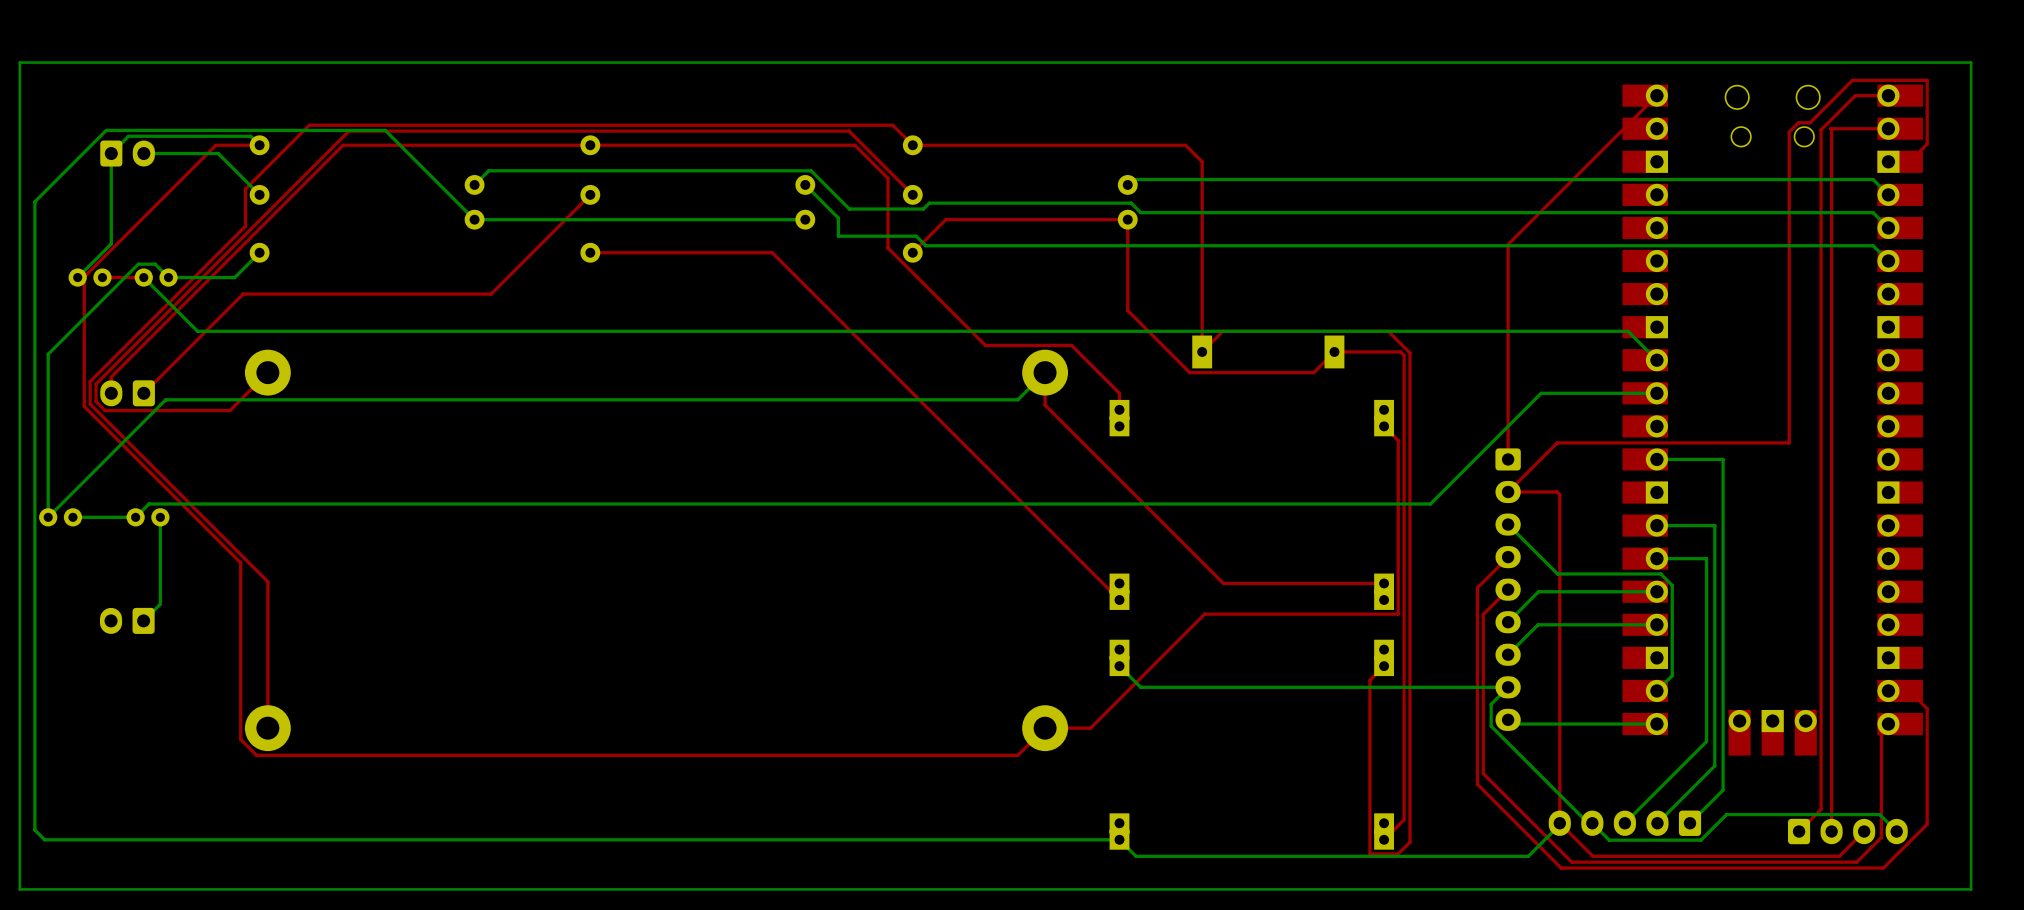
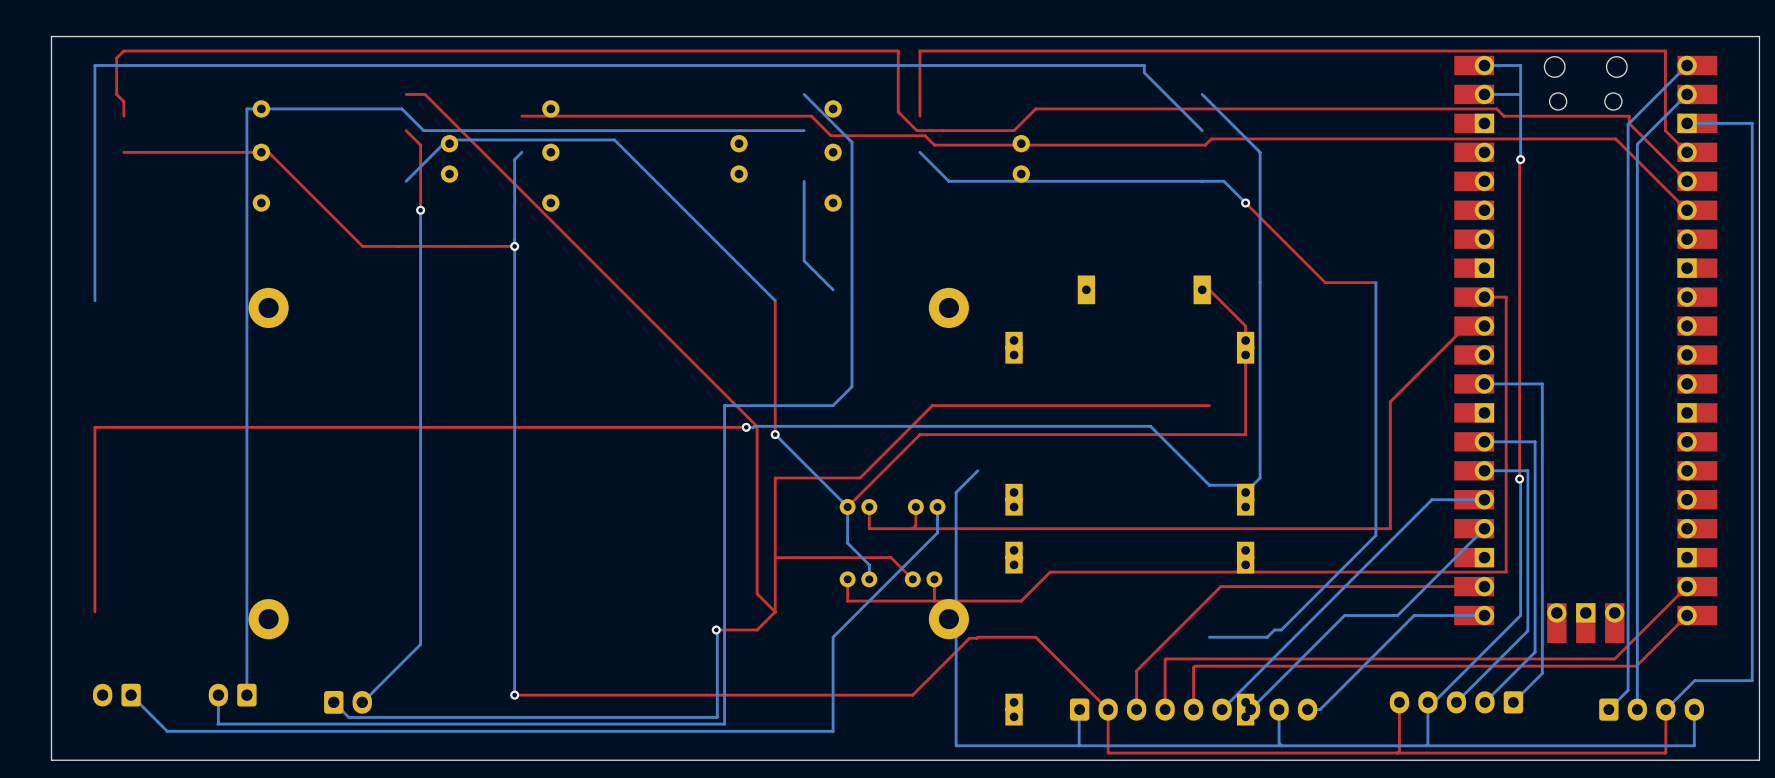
bottom track: (1971, 62) (19, 62) (19, 889) (1971, 889) (1971, 62) -> none
board edge: none -> (1759, 36) (51, 36) (51, 760) (1759, 760) (1759, 36)
bottom track: none -> (1484, 65) (1520, 65) (1520, 159)
top track: (1656, 95) (1508, 244) (1508, 459) -> none
bottom track: none -> (1687, 65) (1628, 124) (1628, 690) (1608, 709)
top track: (1888, 95) (1855, 95) (1821, 129) (1821, 809) (1799, 831) -> none
top track: none -> (406, 94) (425, 94) (757, 426) (757, 593) (775, 611)
bottom track: none -> (804, 94) (852, 142) (852, 386) (833, 405) (724, 405) (724, 724) (217, 724) (218, 695)
bottom track: none -> (1202, 94) (1260, 152) (1260, 478) (1252, 485) (1209, 485) (1150, 426) (746, 427)
bottom track: none -> (1520, 94) (1484, 94)
bottom track: none -> (1687, 94) (1637, 144) (1637, 709)
top track: (1888, 128) (1830, 128) (1831, 831) -> none
bottom track: (259, 145) (250, 136) (128, 136) (111, 153) (111, 243) (77, 277) -> none
top track: (259, 145) (215, 145) (84, 276) (84, 406) (240, 562) (240, 739) (256, 755) (1017, 755) (1045, 728) (1090, 728) (1204, 614) (1398, 614) (1398, 440) (1384, 426) -> none
top track: (1144, 145) (912, 145) (892, 125) (309, 125) (245, 189) (245, 226) (90, 381) (90, 404) (267, 581) (267, 728) -> (1035, 108) (1014, 130) (916, 130) (898, 111) (898, 51) (123, 51) (116, 58) (116, 94) (123, 101) (123, 116)
top track: (1185, 145) (1202, 161) (1202, 351) (1222, 331) (1388, 331) (1409, 352) (1409, 842) (1398, 853) (1369, 853) (1369, 680) (1384, 666) -> (1071, 108) (1496, 108) (1504, 116) (1629, 116) (1629, 123) (1687, 181)
part: (127, 153) -> none
bottom track: (143, 153) (218, 153) (259, 194) -> none
top track: none -> (521, 116) (811, 116) (831, 135) (925, 135) (934, 145) (1205, 145) (1211, 138) (1615, 138) (1687, 210)
top track: none -> (919, 116) (919, 51) (1665, 51) (1665, 130) (1687, 152)
bottom track: none -> (1687, 123) (1752, 123) (1752, 680) (1694, 680) (1665, 709)
top track: (1909, 161) (1927, 144) (1927, 80) (1852, 80) (1810, 122) (1798, 122) (1789, 132) (1789, 442) (1557, 442) (1508, 492) (1557, 492) (1559, 494) (1559, 823) (1592, 856) (1839, 856) (1864, 831) -> (514, 695) (912, 695) (969, 638) (1035, 637) (1108, 709) (1108, 753) (1665, 753) (1665, 709)
top track: none -> (406, 130) (420, 145) (420, 210)
bottom track: none -> (804, 130) (423, 130) (401, 108) (246, 108) (246, 695)
bottom track: none -> (1202, 130) (1144, 72) (1144, 65) (94, 65) (94, 300)
bottom track: (1133, 179) (1873, 179) (1888, 194) -> none
bottom track: (474, 184) (488, 170) (811, 170) (849, 209) (923, 209) (929, 203) (1131, 203) (1140, 212) (1873, 212) (1888, 227) -> none
bottom track: (805, 184) (838, 218) (838, 236) (916, 236) (925, 245) (1873, 245) (1888, 261) -> none
top track: none -> (123, 152) (268, 152) (362, 246) (514, 246)
bottom track: none -> (521, 152) (514, 159) (514, 695)
top track: (590, 194) (491, 294) (243, 294) (143, 393) -> none
top track: (912, 194) (849, 131) (348, 131) (96, 384) (96, 401) (104, 410) (229, 410) (267, 372) -> none
bottom track: none -> (919, 152) (948, 181) (1223, 181) (1245, 203)
top track: none -> (1520, 159) (1519, 479)
via: none -> (1520, 159)
bottom track: (805, 219) (474, 219) (385, 130) (106, 130) (34, 201) (34, 830) (44, 839) (1119, 839) (1136, 856) (1528, 856) (1559, 824) -> none
bottom track: none -> (406, 181) (447, 139) (614, 139) (775, 300)
bottom track: none -> (804, 181) (804, 260) (833, 289)
bottom track: (259, 252) (234, 277) (168, 277) (155, 264) (138, 264) (48, 354) (48, 517) (165, 399) (1017, 399) (1045, 372) -> none
top track: (590, 252) (772, 252) (1119, 600) -> none
top track: (912, 252) (945, 219) (1127, 219) (1127, 310) (1189, 372) (1313, 372) (1334, 351) (1400, 351) (1404, 355) (1404, 819) (1384, 839) -> none
top track: none -> (1245, 203) (1325, 282) (1375, 282)
via: none -> (1245, 203)
bottom track: none -> (420, 210) (420, 644) (362, 702)
via: none -> (420, 210)
part: (90, 277) -> none
bottom track: (143, 277) (197, 331) (1628, 331) (1656, 360) -> none
top track: (143, 277) (102, 277) -> none
part: (156, 277) -> none
via: none -> (514, 246)
bottom track: none -> (1375, 282) (1375, 535) (1281, 629) (1274, 629) (1267, 637) (1209, 637)
top track: none -> (1209, 289) (1245, 326) (1245, 434) (920, 434) (847, 506)
top track: none -> (1484, 297) (1506, 297) (1506, 572) (1050, 572) (1021, 601) (847, 601)
top track: none -> (775, 300) (775, 434)
top track: (1045, 372) (1045, 405) (1223, 583) (1384, 583) -> none
top track: (111, 393) (111, 377) (343, 145) (854, 145) (887, 178) (887, 247) (985, 345) (1071, 345) (1119, 393) (1119, 409) -> none
part: (127, 393) -> none
top track: none -> (1466, 326) (1390, 401) (1390, 528) (869, 528) (869, 506)
bottom track: (1656, 393) (1541, 393) (1430, 503) (149, 503) (135, 517) (72, 517) -> none
top track: none -> (1209, 405) (932, 405) (860, 478) (775, 478) (775, 611)
top track: none -> (746, 427) (94, 427) (94, 611)
via: none -> (746, 427)
part: (60, 517) -> none
part: (148, 517) -> none
bottom track: (160, 517) (160, 604) (143, 620) -> none
bottom track: none -> (775, 434) (847, 506) (847, 543)
via: none -> (775, 434)
bottom track: (1508, 524) (1557, 573) (1660, 573) (1672, 585) (1672, 675) (1656, 690) -> none
top track: (1508, 557) (1477, 587) (1477, 784) (1561, 868) (1883, 868) (1927, 824) (1927, 708) (1909, 690) -> none
bottom track: none -> (977, 470) (956, 492) (956, 745) (1694, 745) (1694, 709)
bottom track: none -> (1519, 479) (1520, 615) (1433, 702)
via: none -> (1519, 479)
top track: (1508, 589) (1483, 614) (1483, 773) (1571, 862) (1856, 862) (1881, 837) (1881, 731) -> none
part rotation: 0° (1508, 589) -> 90° counterclockwise (1193, 709)
part position: (1508, 589) -> (1193, 709)
bottom track: (1596, 591) (1538, 591) (1508, 622) -> (1431, 499) (1222, 709)
part: none -> (858, 506)
top track: none -> (915, 506) (915, 525) (912, 528)
part: none -> (926, 506)
bottom track: none -> (937, 506) (937, 532) (833, 637) (833, 731) (167, 731) (131, 695)
part: (127, 620) -> none
bottom track: (1656, 624) (1538, 624) (1508, 654) -> (1484, 528) (1397, 615)
bottom track: none -> (847, 543) (869, 564) (869, 579)
top track: none -> (775, 557) (891, 557) (912, 579)
bottom track: (1119, 666) (1140, 687) (1508, 687) (1491, 704) (1491, 726) (1588, 823) -> none
top track: none -> (847, 579) (847, 600)
part: none -> (858, 579)
part: none -> (923, 579)
top track: none -> (934, 579) (934, 601)
top track: none -> (1484, 586) (1220, 586) (1136, 670) (1136, 709)
top track: none -> (1687, 586) (1614, 658) (1166, 658) (1165, 709)
top track: none -> (775, 611) (757, 629) (716, 629)
bottom track: none -> (1357, 615) (1344, 615) (1250, 709)
bottom track: (1576, 724) (1557, 724) -> (1414, 615) (1320, 709) (1307, 709)
top track: none -> (1687, 615) (1636, 666) (1194, 666) (1193, 709)
bottom track: none -> (716, 629) (716, 717) (348, 717) (333, 702)
via: none -> (716, 629)
part: none -> (116, 695)
part: none -> (232, 695)
via: none -> (514, 695)
part: none -> (347, 702)
top track: none -> (1399, 702) (1399, 751) (1397, 753)
bottom track: (1592, 823) (1609, 840) (1700, 840) (1726, 814) (1879, 814) (1896, 831) -> (1427, 702) (1426, 745)
bottom track: none -> (1279, 709) (1279, 743) (1281, 745)
bottom track: none -> (1079, 710) (1079, 745)

